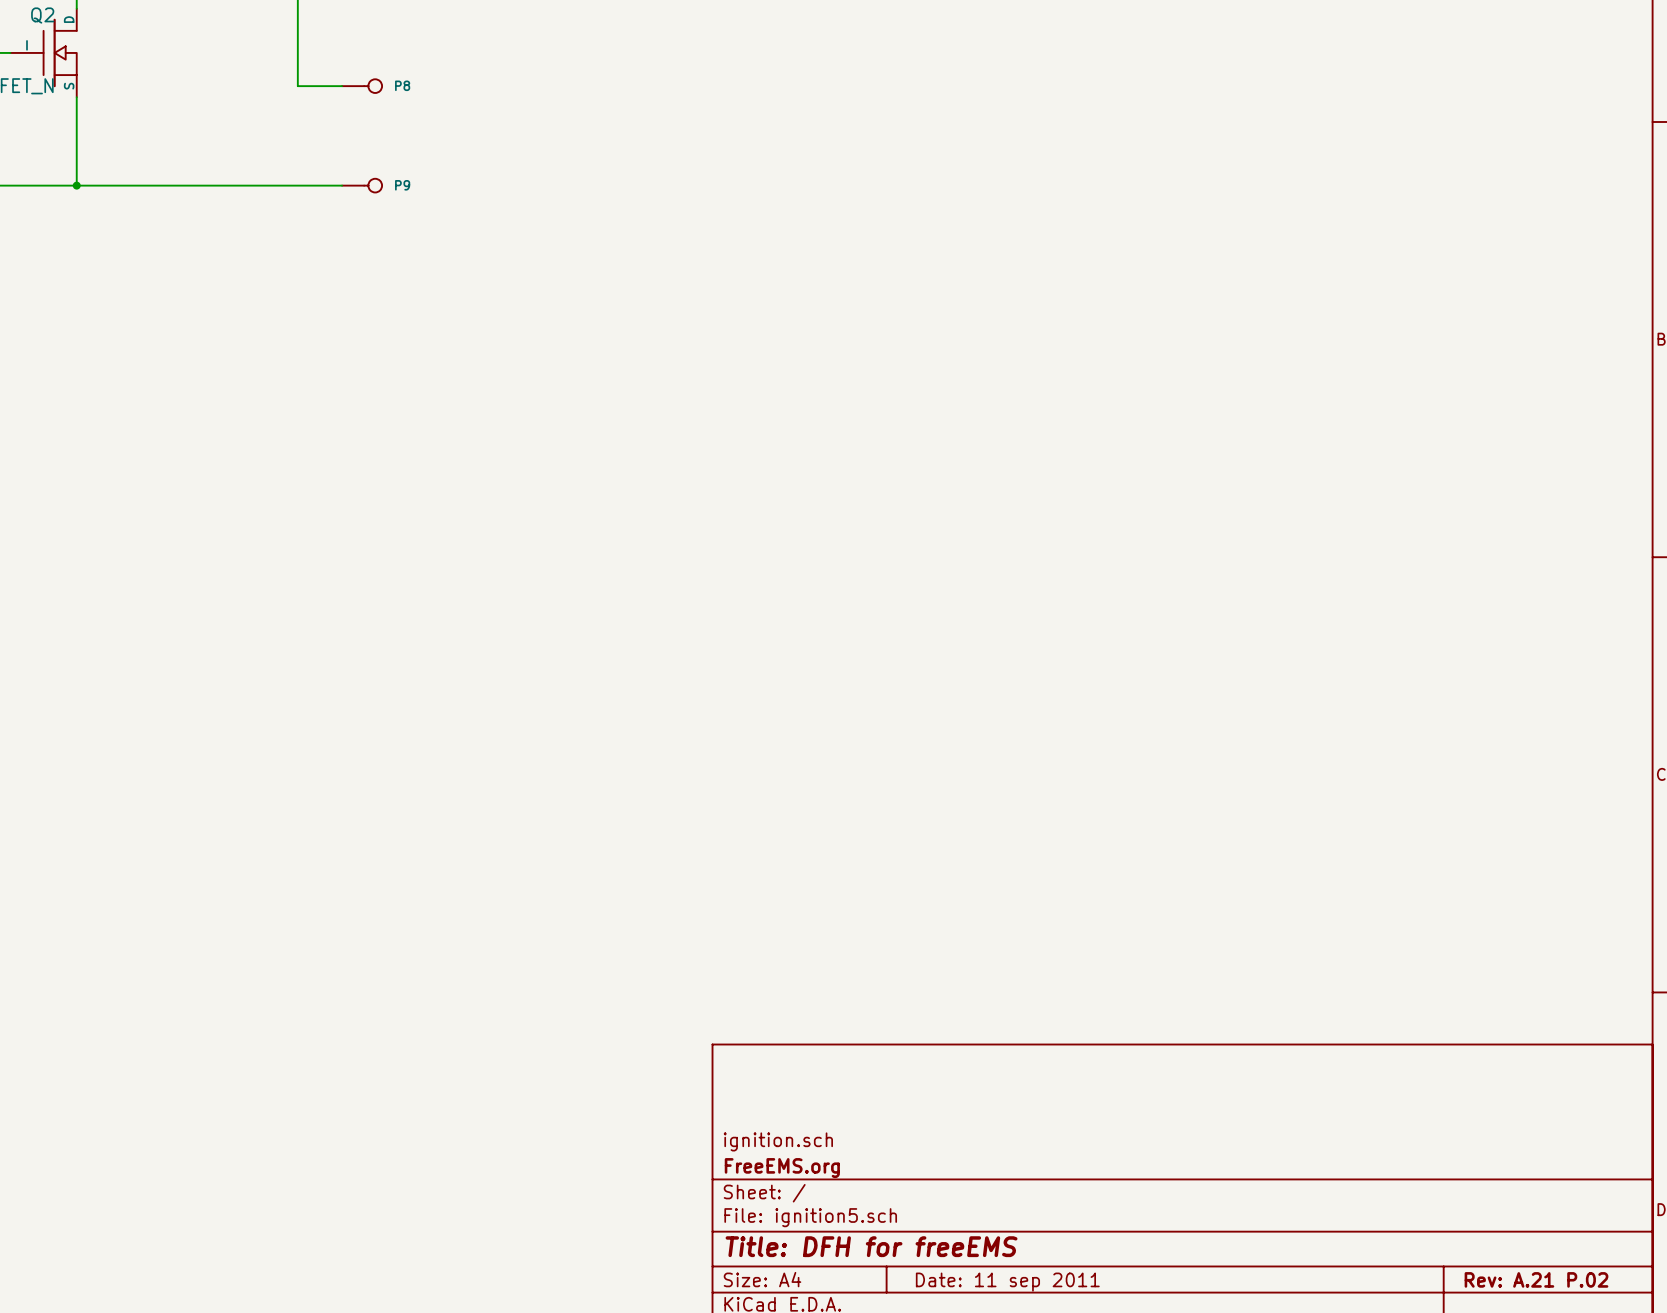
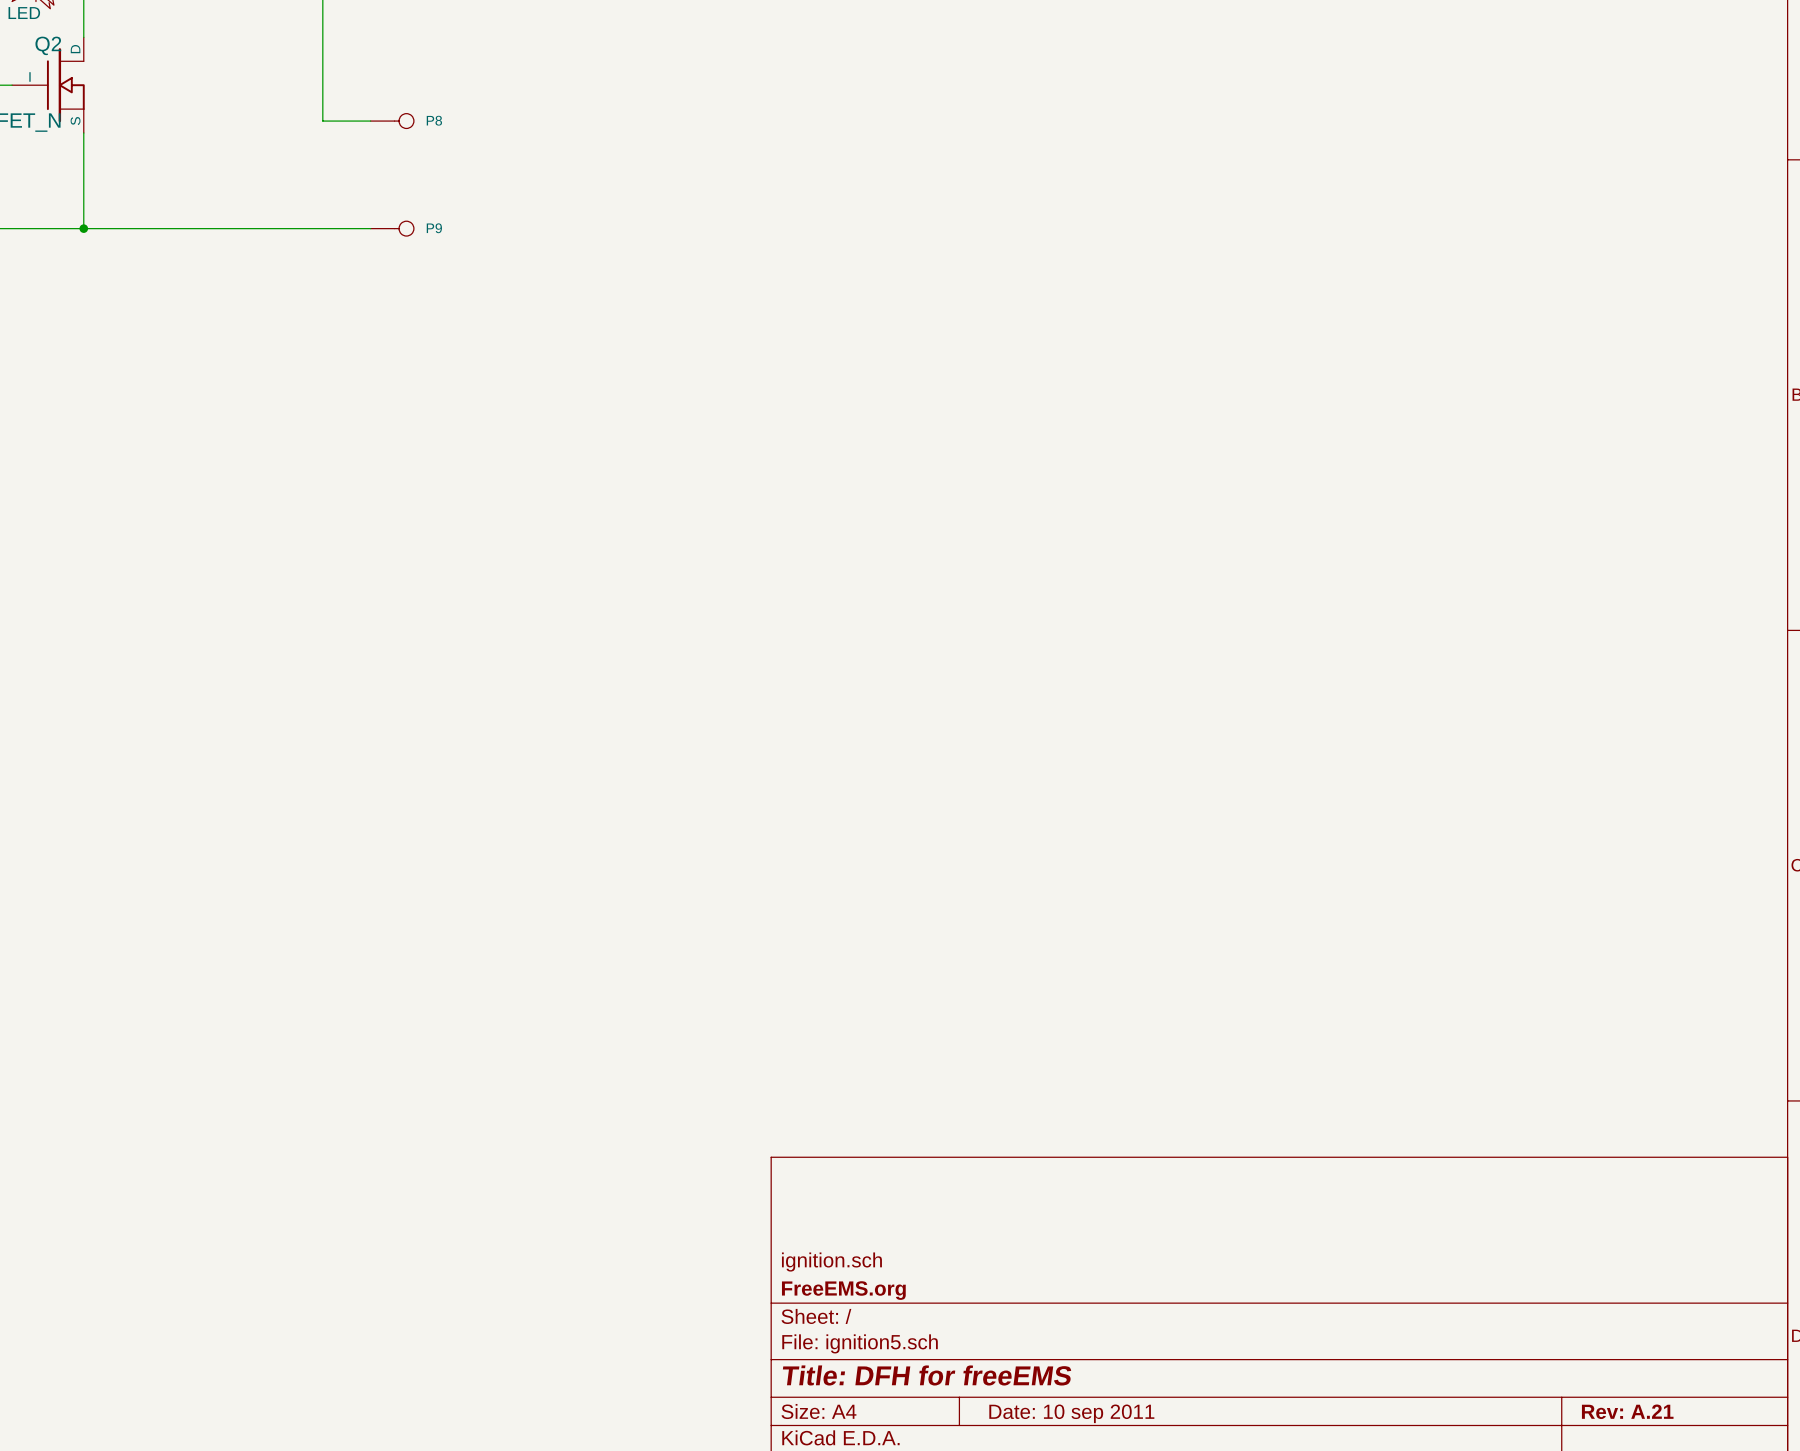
title block: Rev: A.21 P.02 (1536, 1279) -> Rev: A.21 (1627, 1411)
title block: Date: 11 sep 2011 (1007, 1282) -> Date: 10 sep 2011 (1071, 1413)

